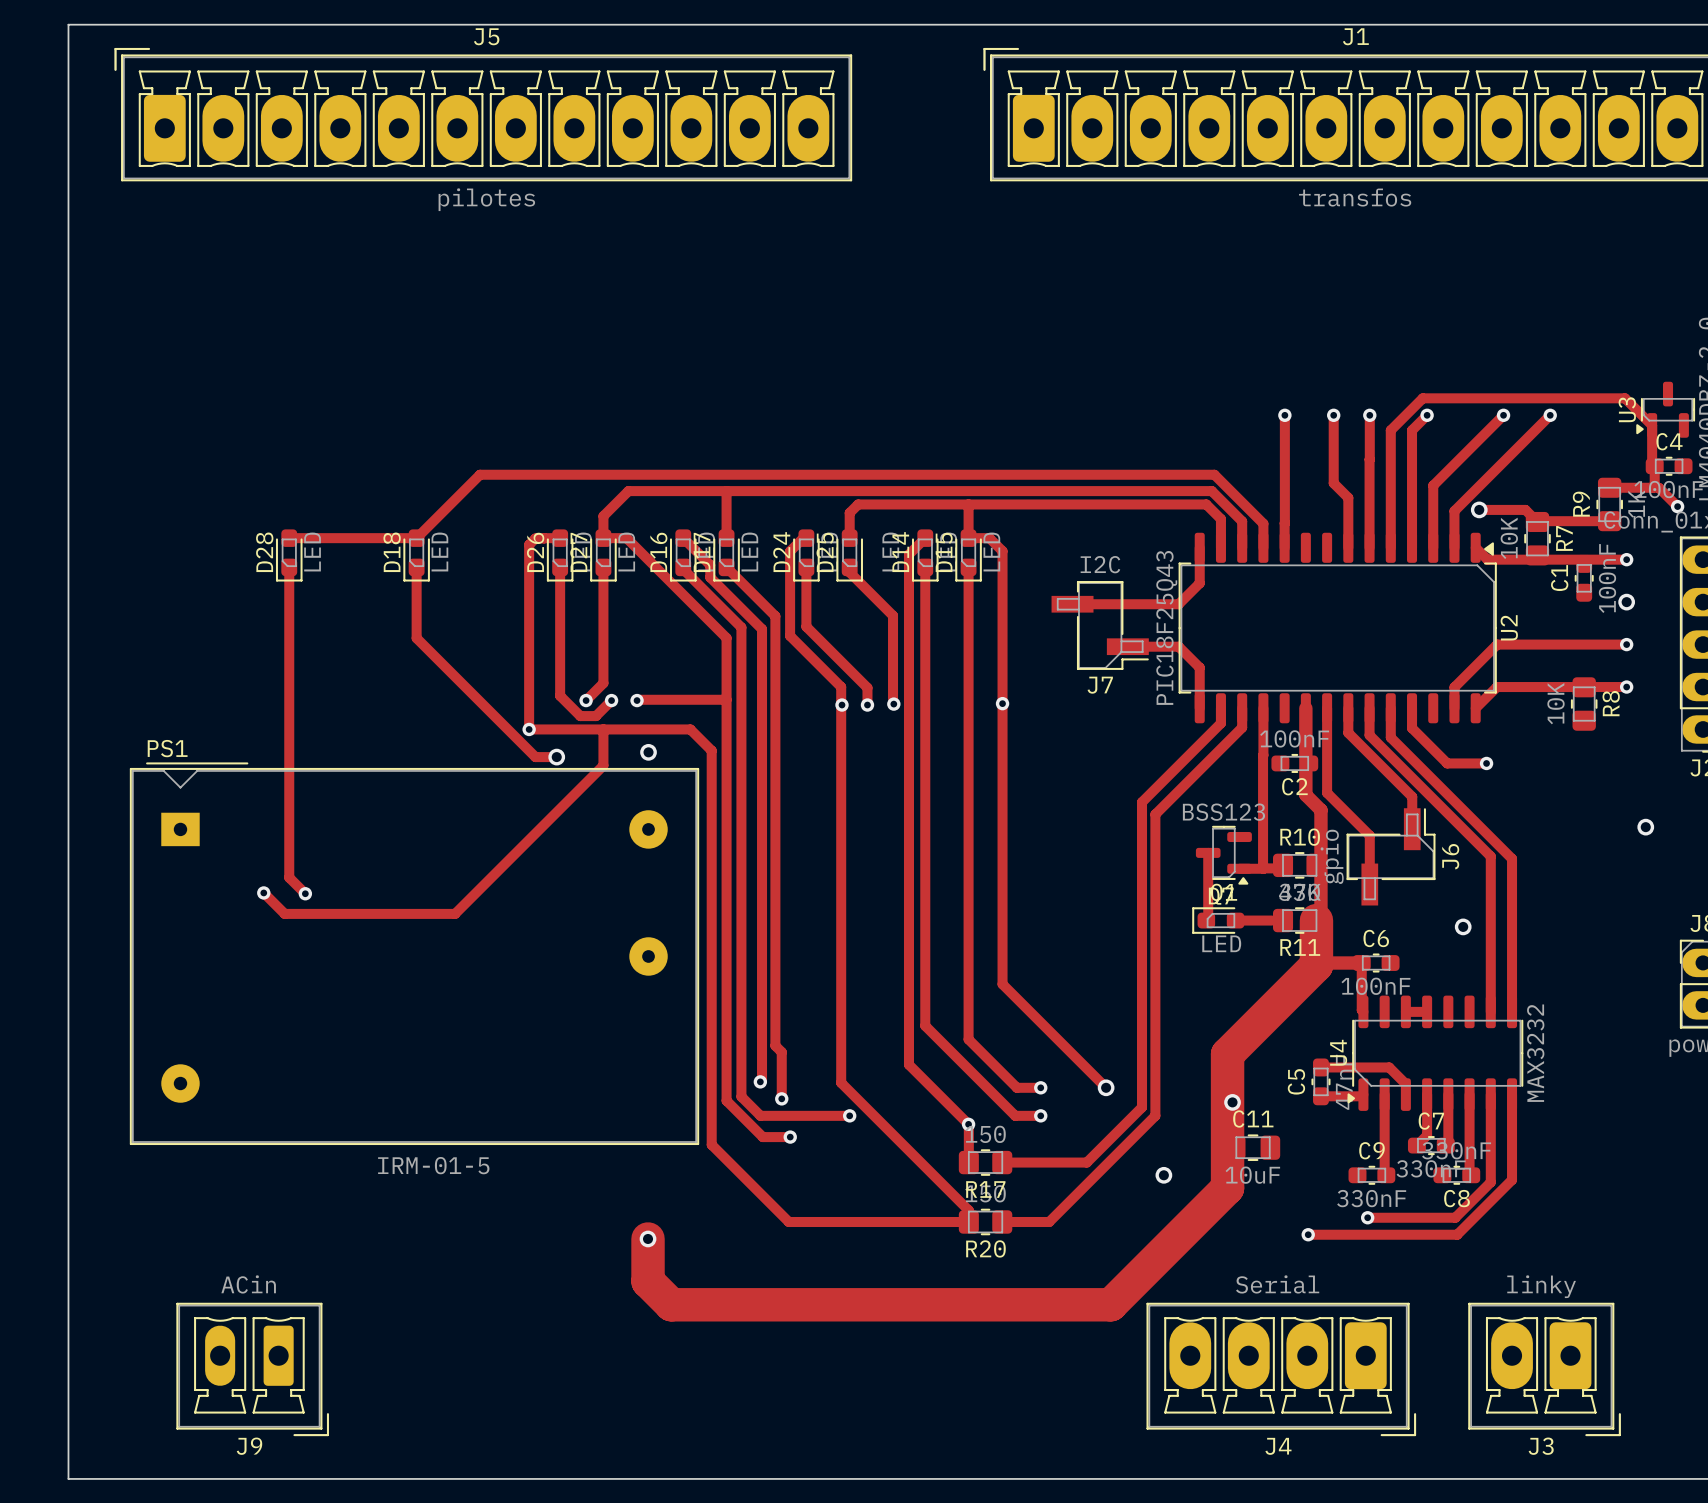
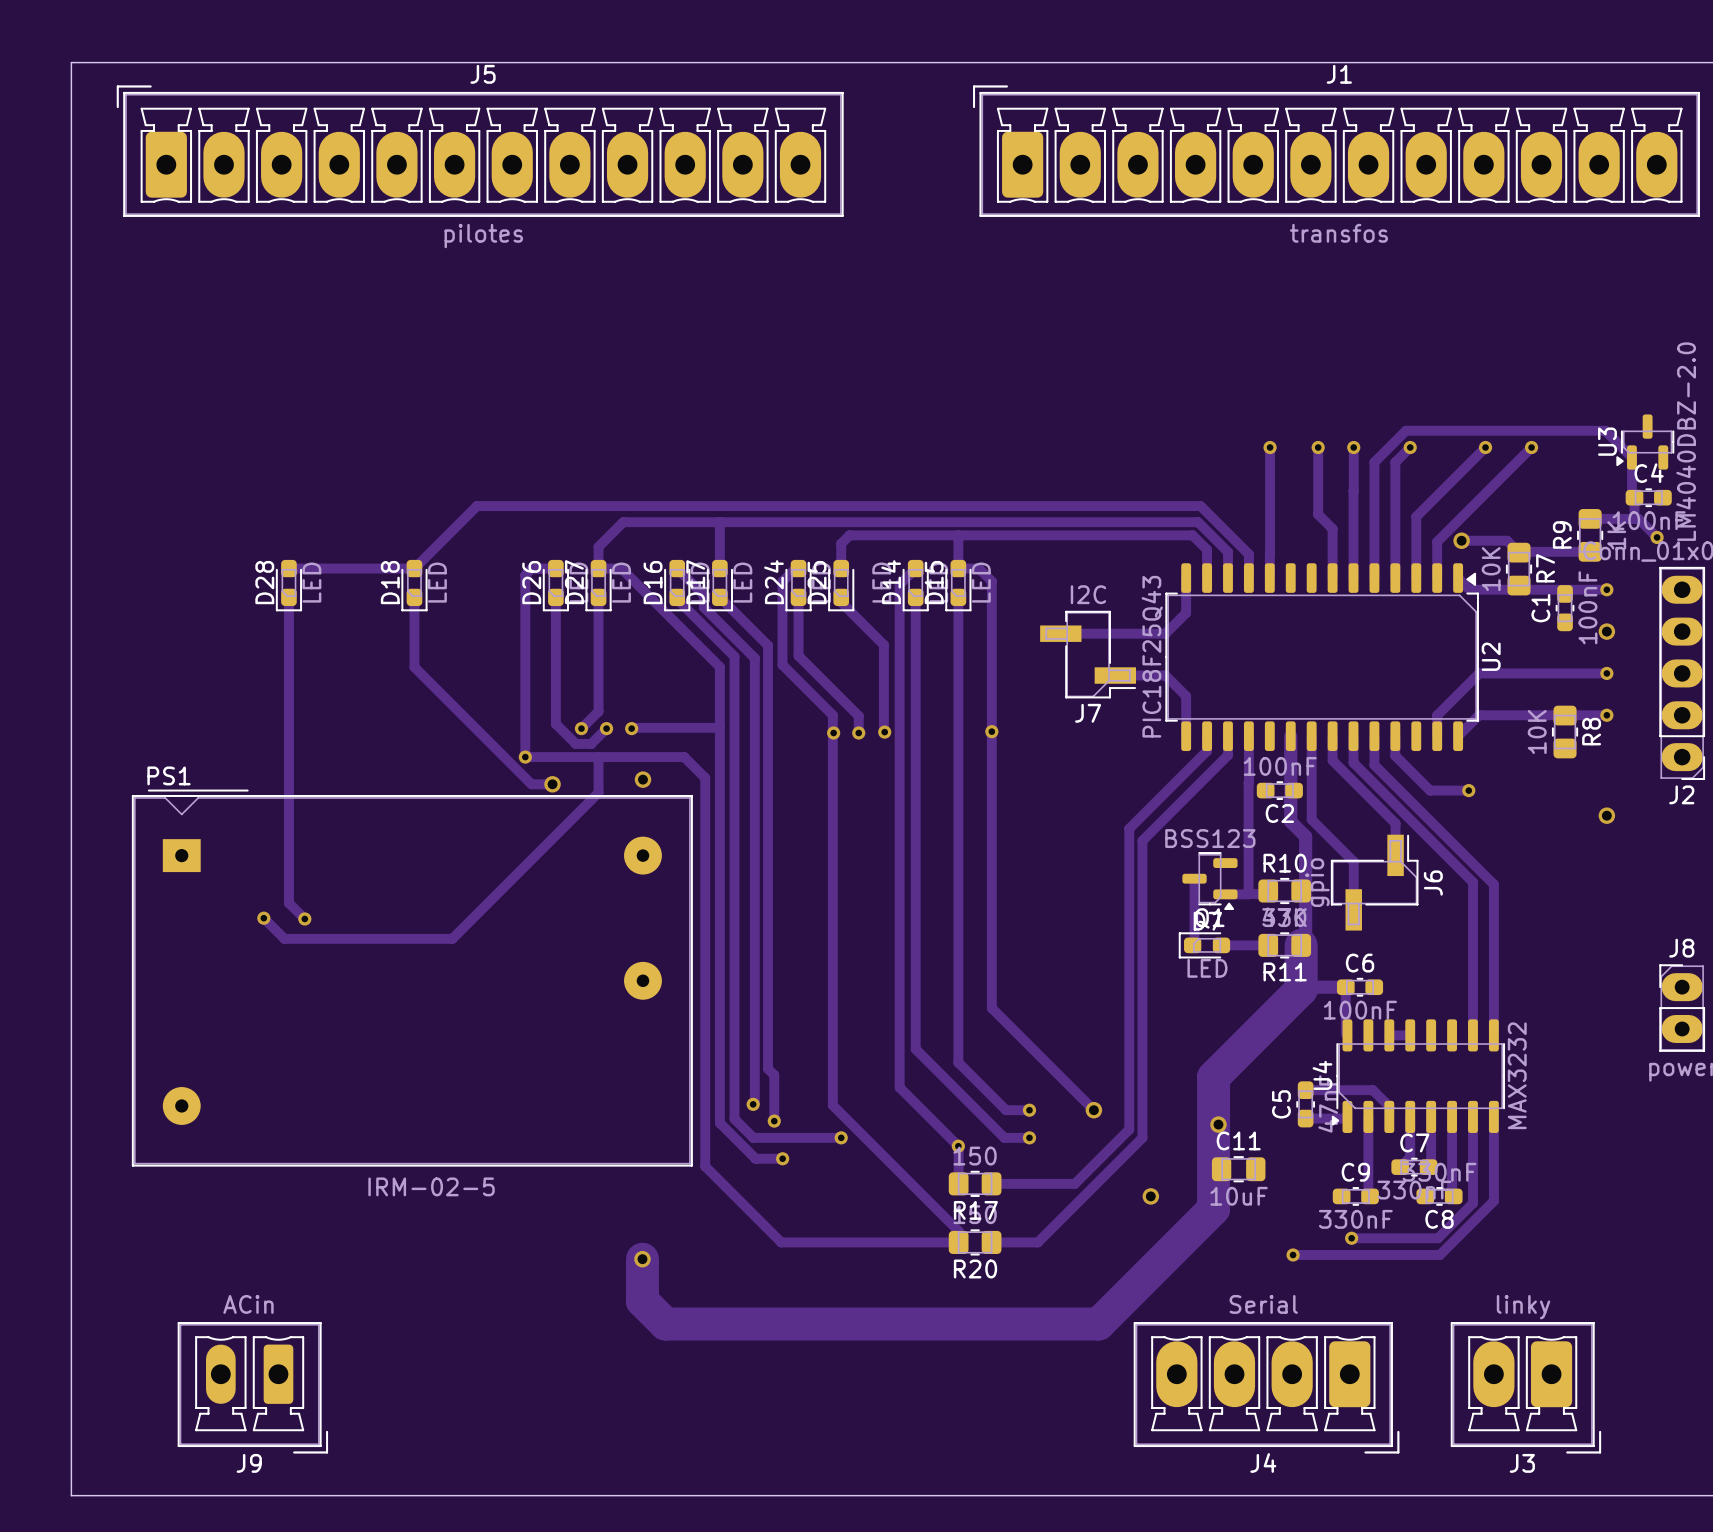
via position: (1645, 827) -> (1606, 815)
via: (1463, 926) -> none
PS1 value: IRM-01-5 (433, 1165) -> IRM-02-5 (431, 1186)

